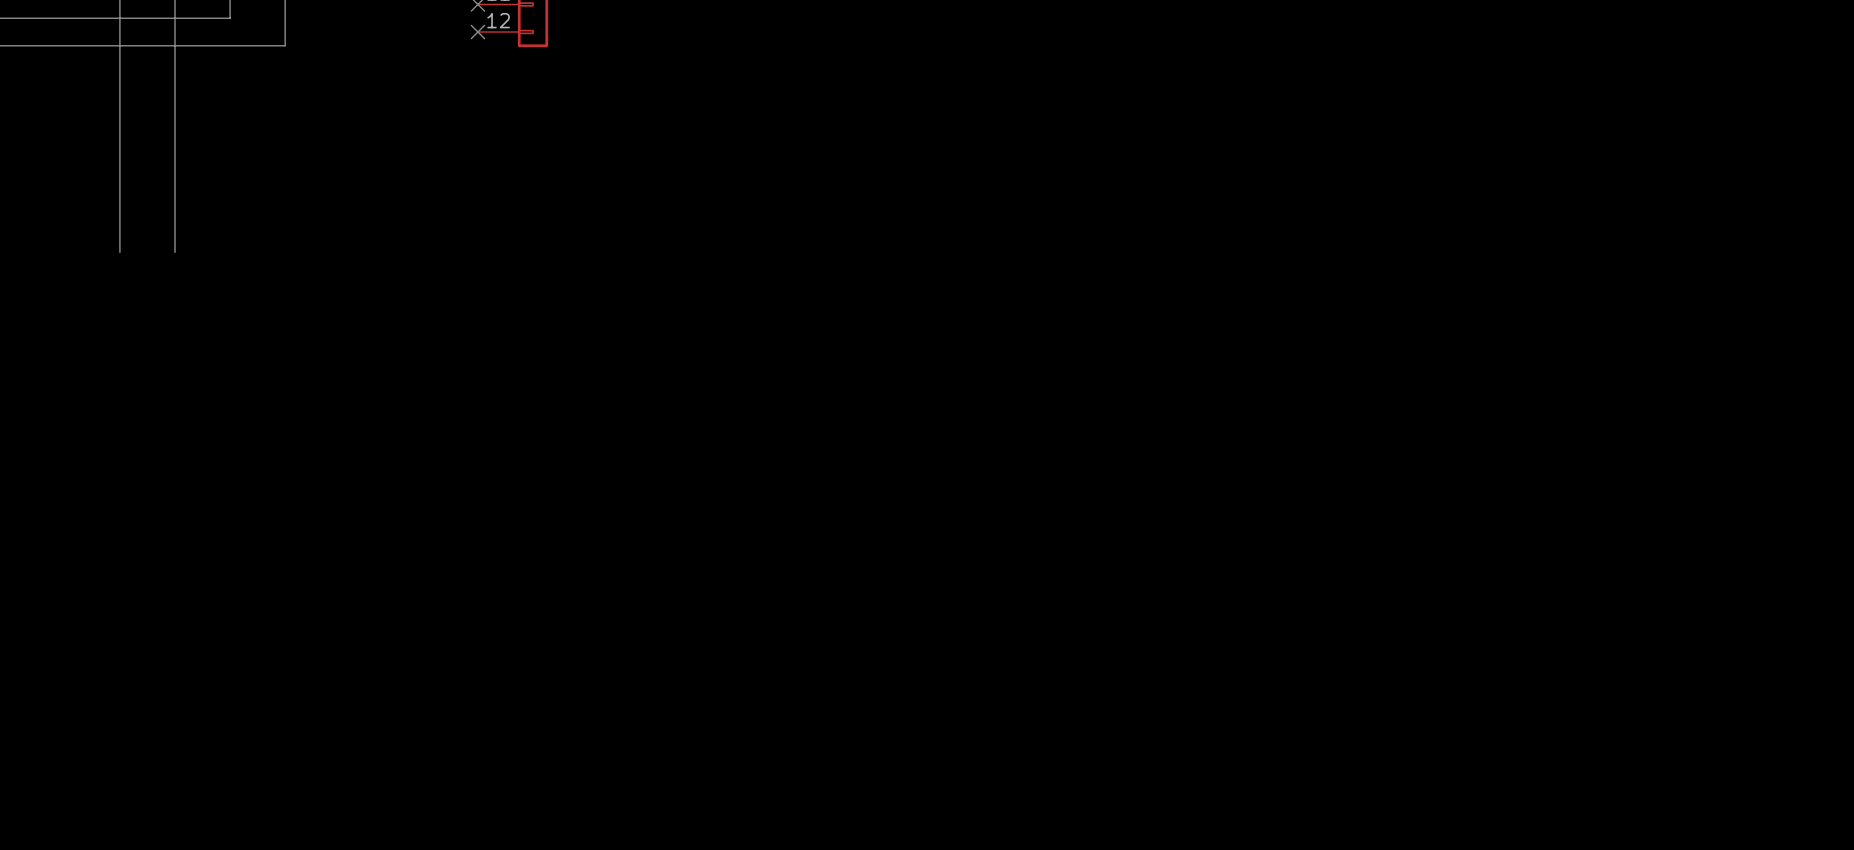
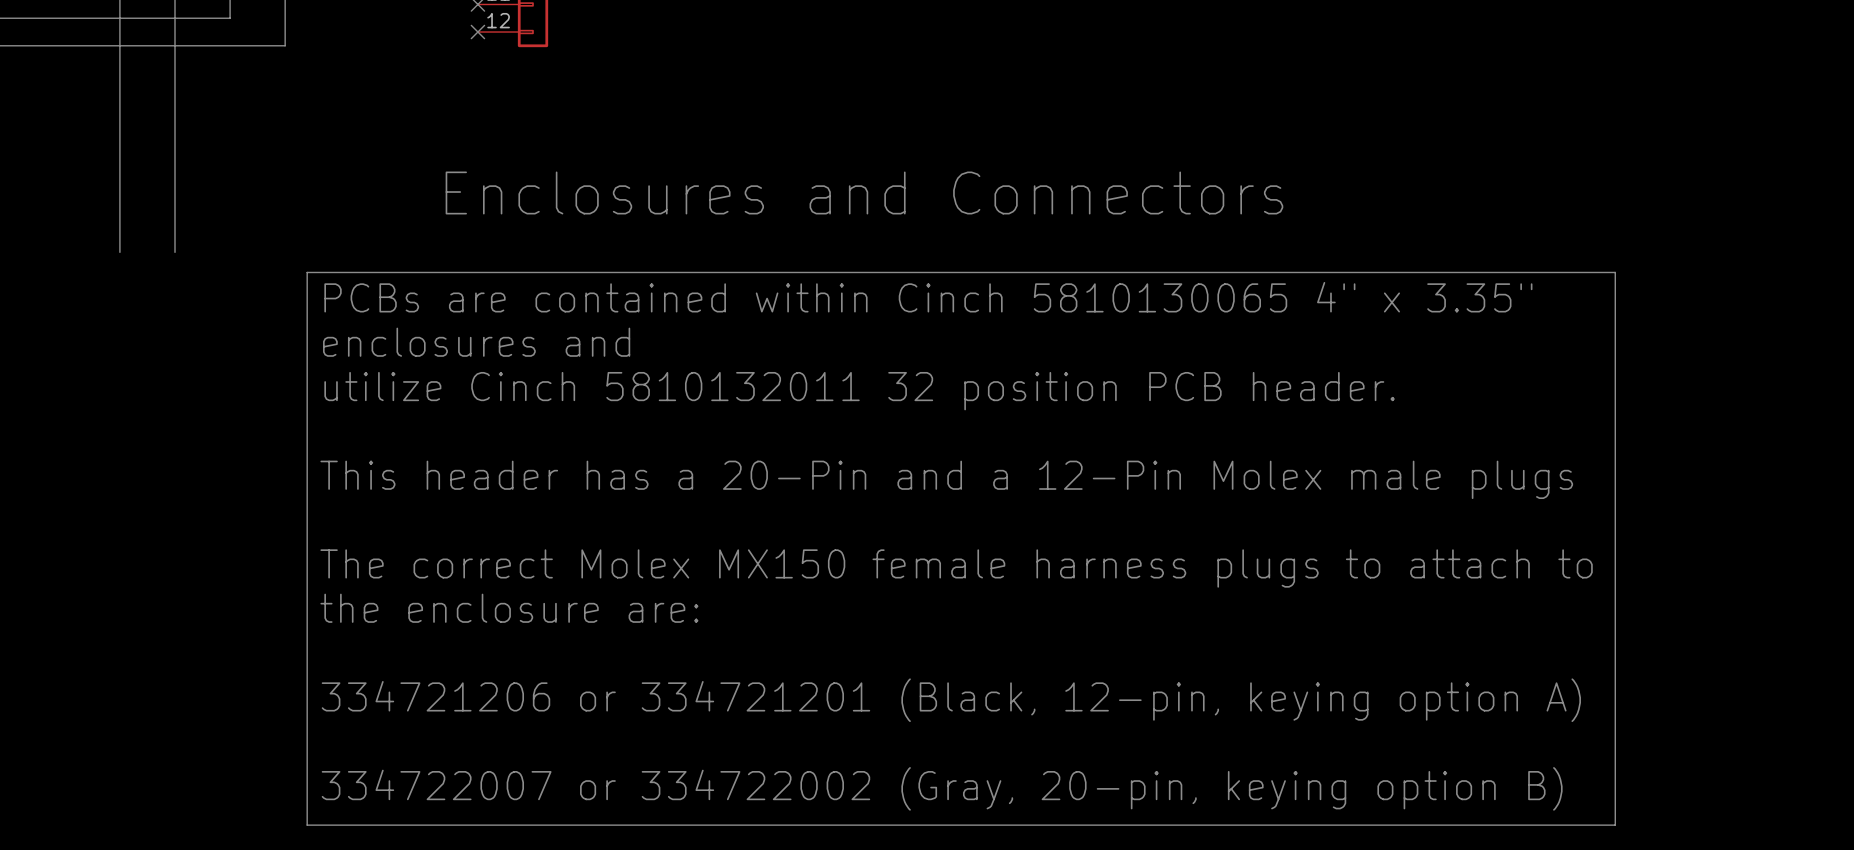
text: none -> Enclosures and Connectors (864, 192)
line: none -> (307, 272) (1615, 272) (1615, 825) (307, 825) (307, 272)
text: none -> PCBs are contained within Cinch 5810130065 4" x 3.35" (928, 297)
text: none -> enclosures and (476, 342)
text: none -> utilize Cinch 5810132011 32 position PCB header. (859, 391)
text: none -> This header has a 20-Pin and a 12-Pin Molex male plugs (946, 479)
text: none -> The correct Molex MX150 female harness plugs to attach to (956, 568)
text: none -> the enclosure are: (509, 608)
text: none -> 334721206 or 334721201 (Black, 12-pin, keying option A) (951, 700)
text: none -> 334722007 or 334722002 (Gray, 20-pin, keying option B) (942, 788)

